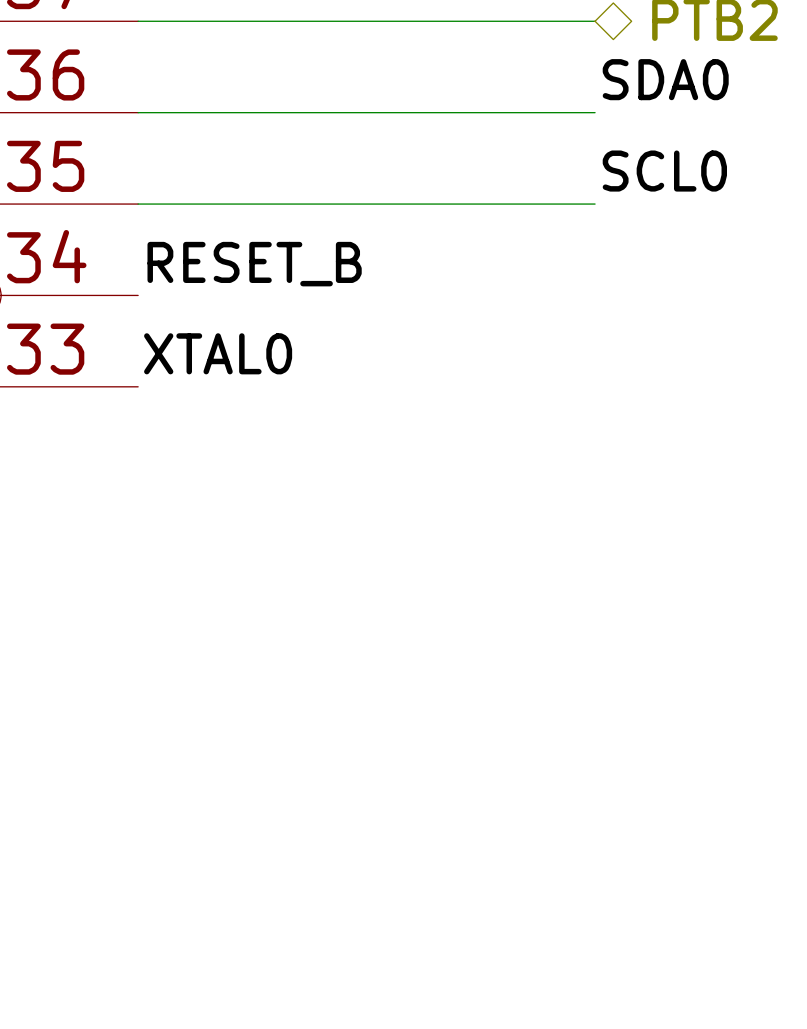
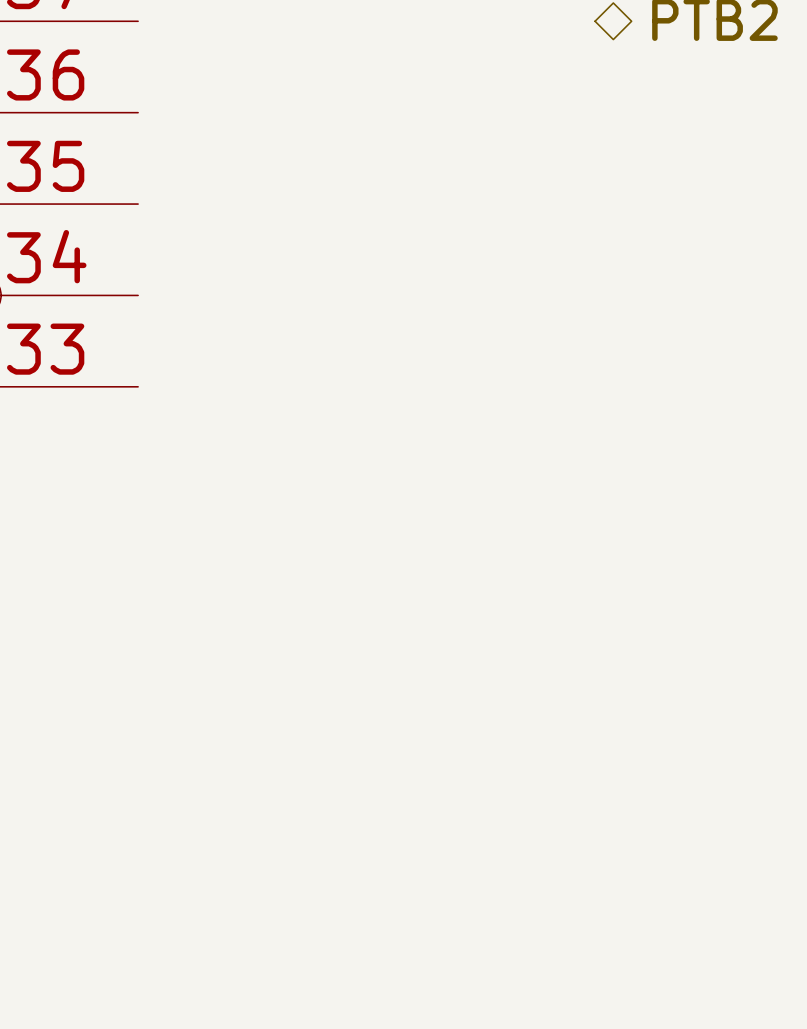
wire: (138, 21) (595, 21) -> none
label: SDA0 (665, 79) -> none
wire: (138, 112) (595, 112) -> none
label: SCL0 (664, 171) -> none
wire: (138, 204) (595, 204) -> none
label: RESET_B (254, 264) -> none
label: XTAL0 (218, 353) -> none

